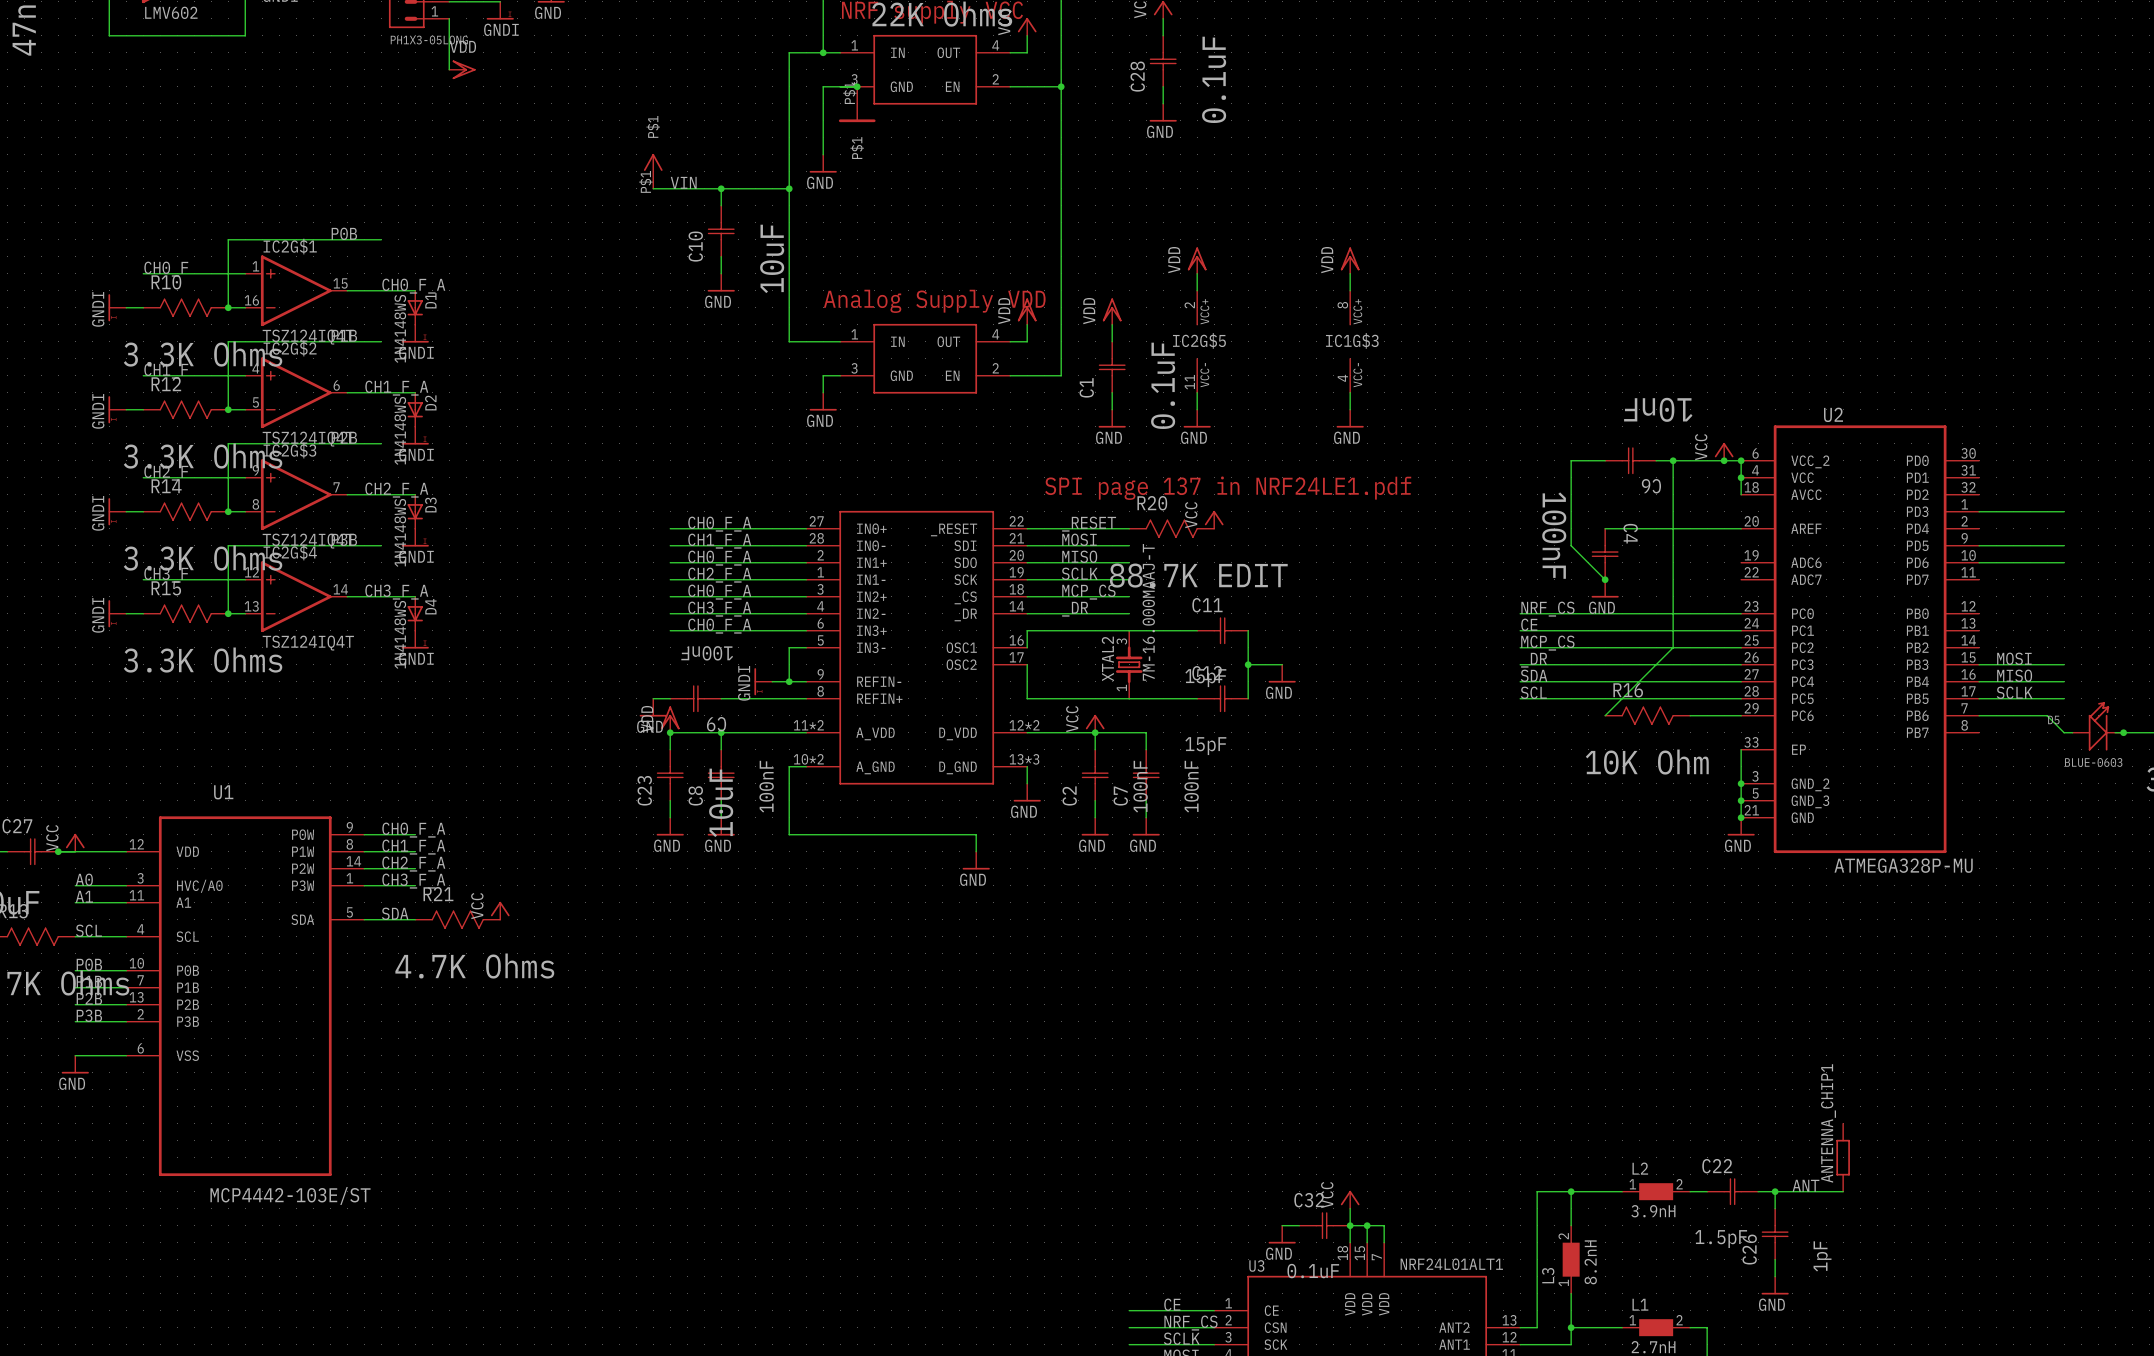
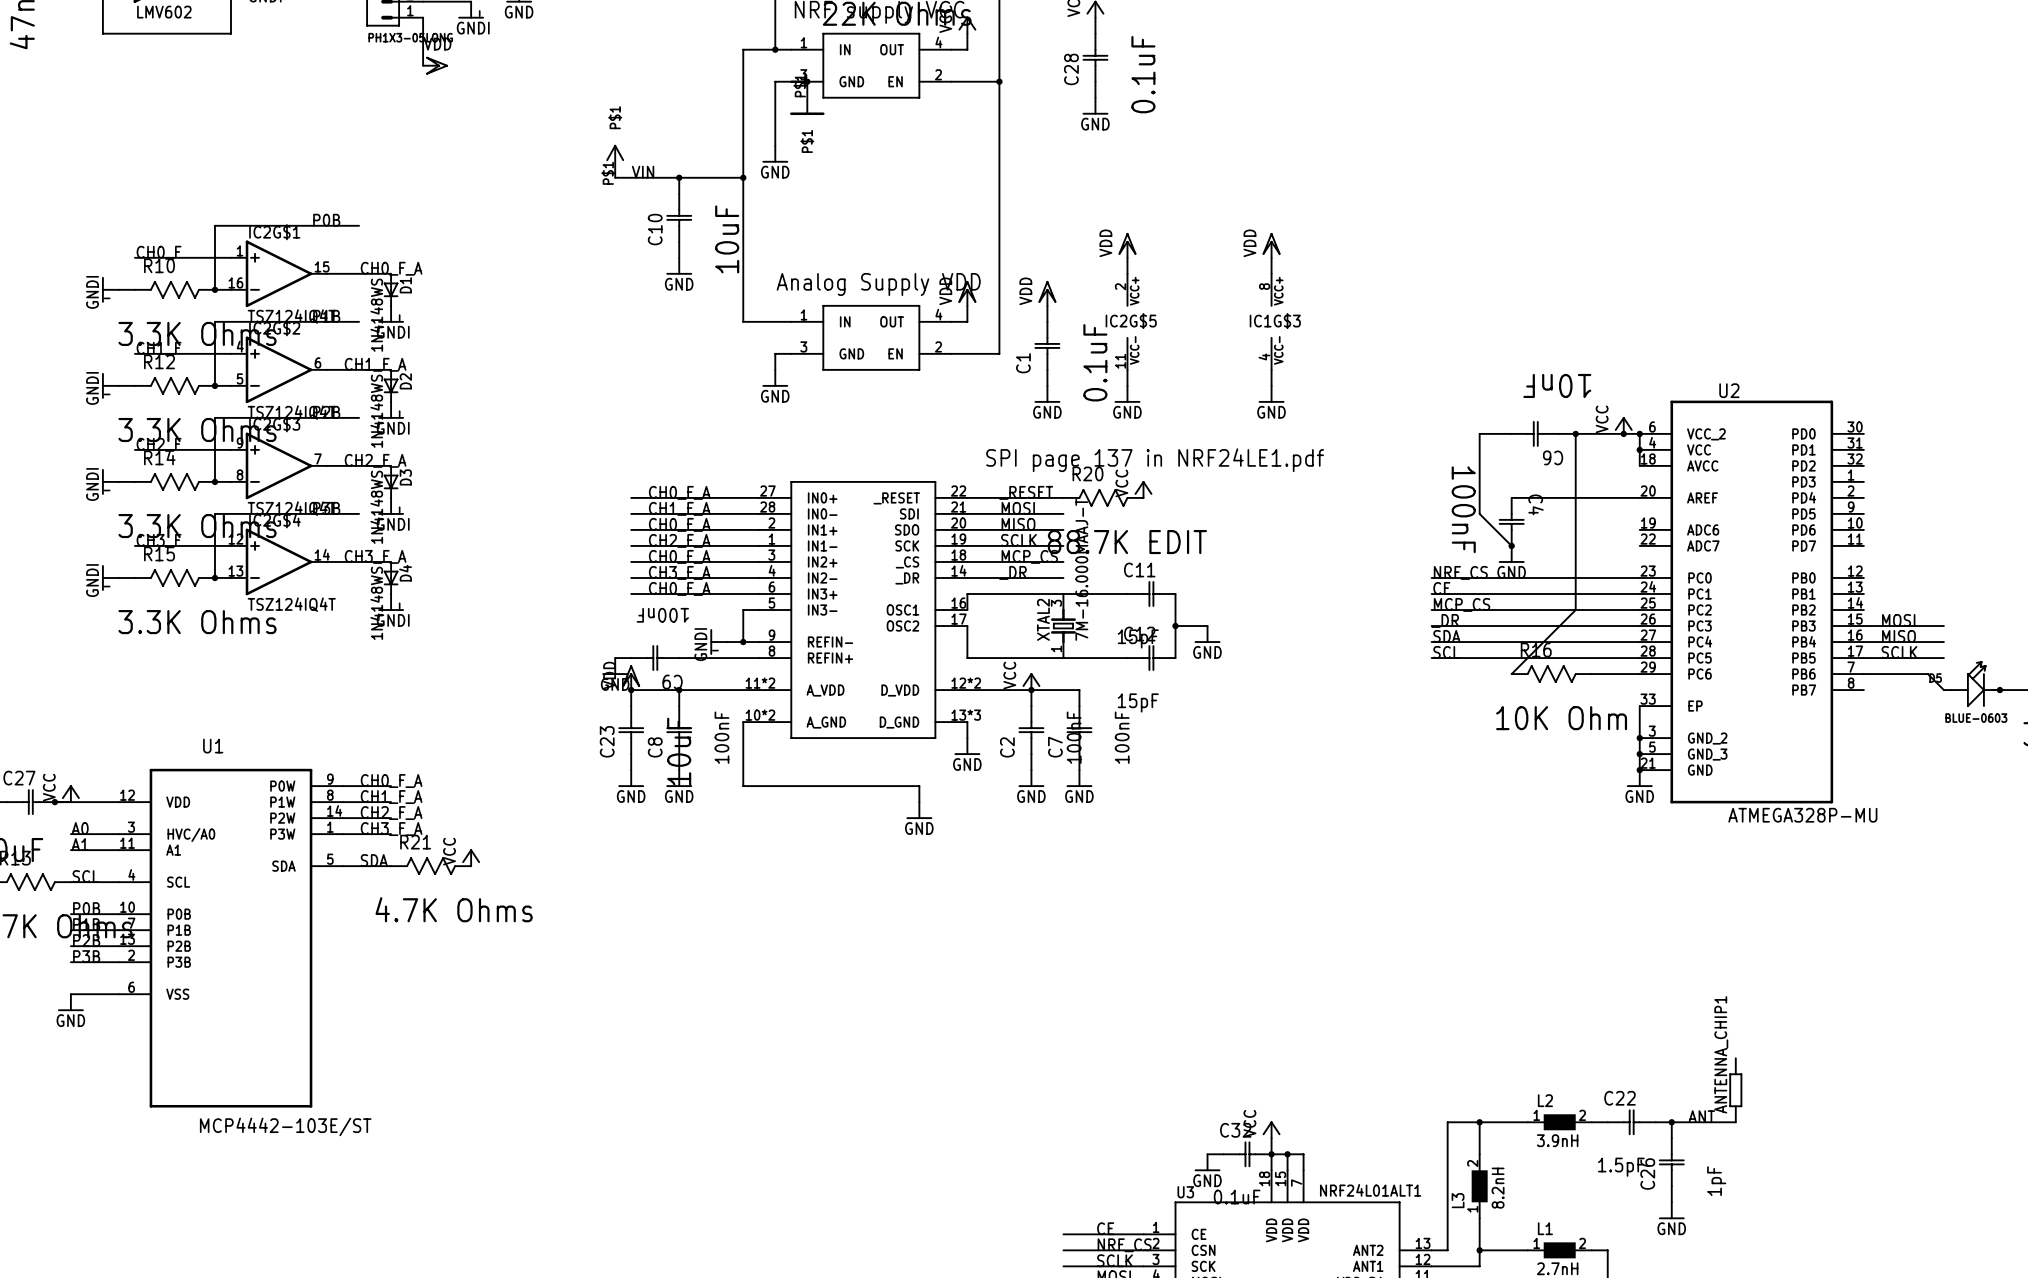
wire: (1979, 511) (2064, 511) -> none
wire: (1979, 545) (2064, 545) -> none
wire: (1979, 562) (2064, 562) -> none

